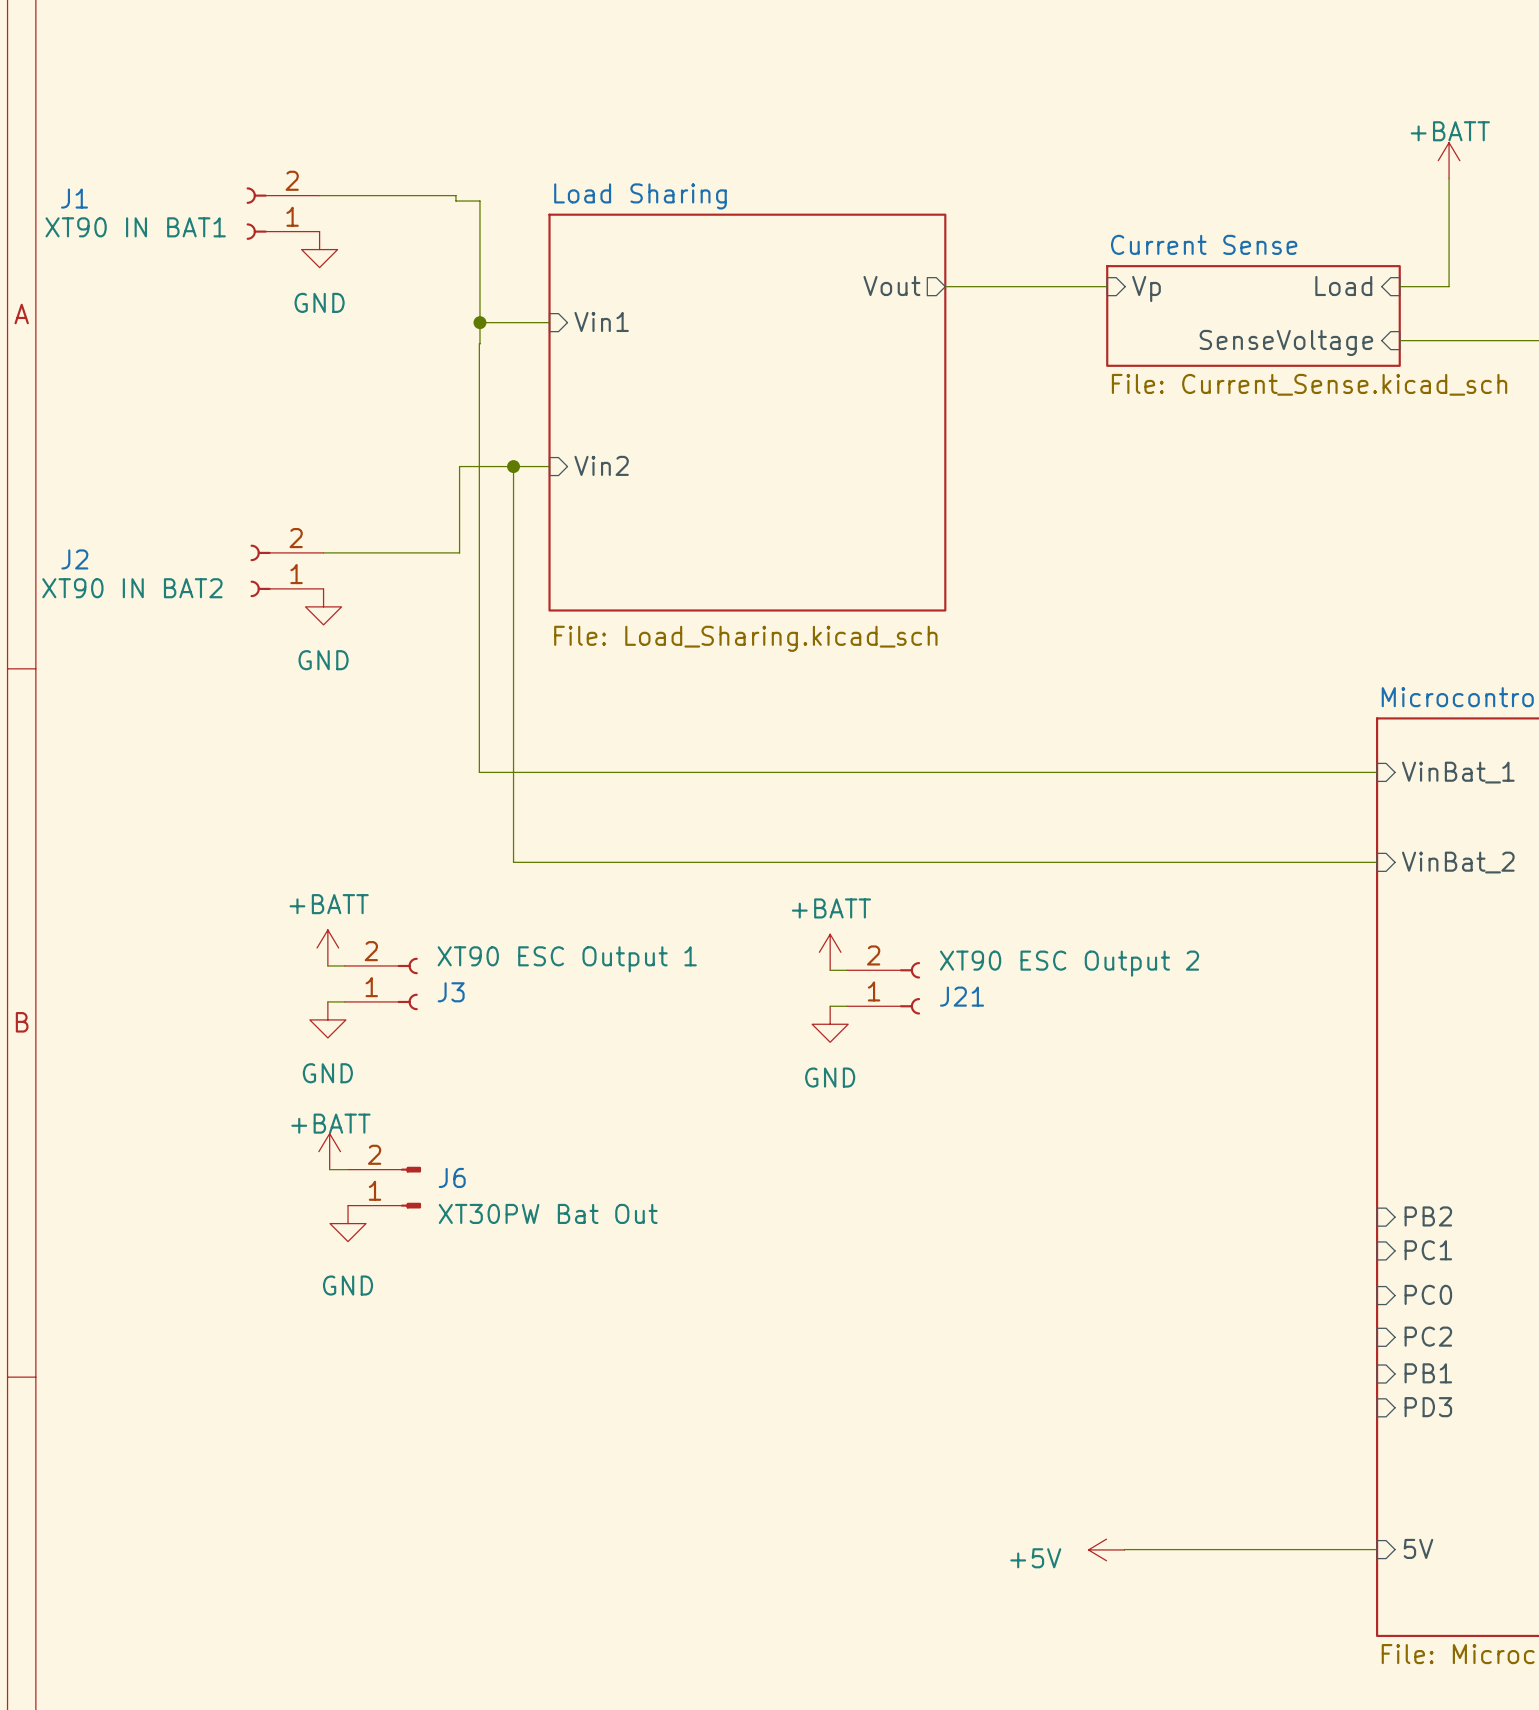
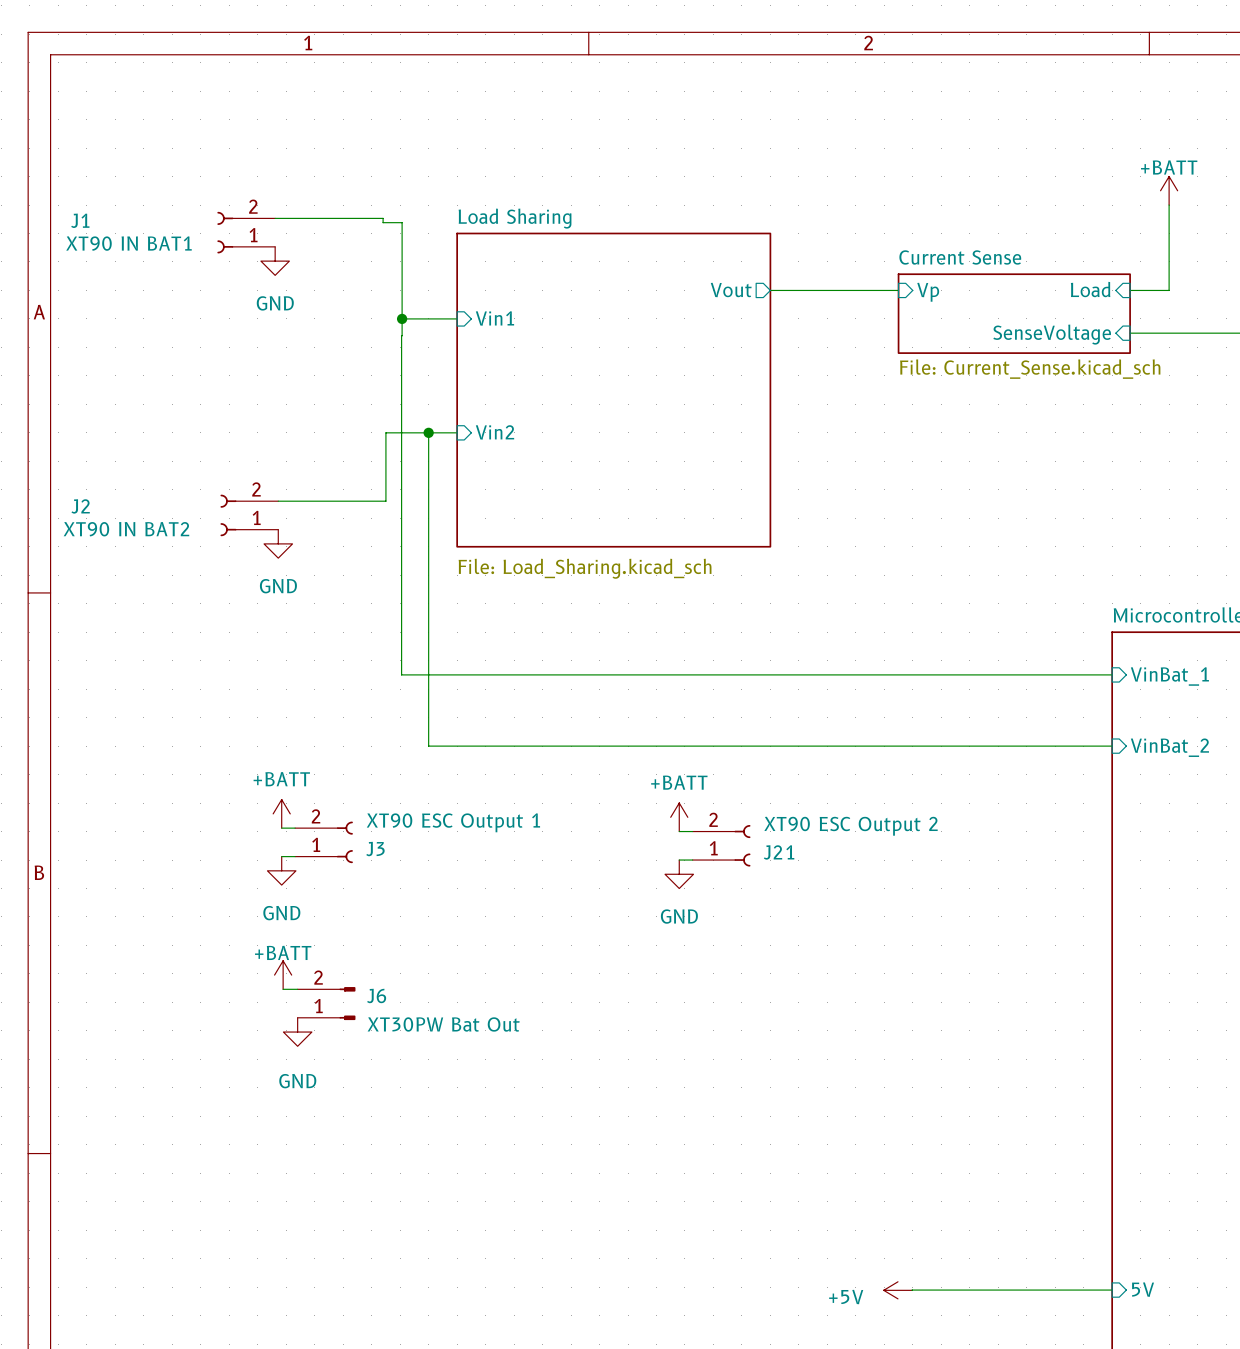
sheet pin: PB2 (1428, 1216) -> none
sheet pin: PC1 (1428, 1250) -> none
sheet pin: PC0 (1428, 1294) -> none
sheet pin: PC2 (1428, 1336) -> none
sheet pin: PB1 (1428, 1373) -> none
sheet pin: PD3 (1428, 1407) -> none

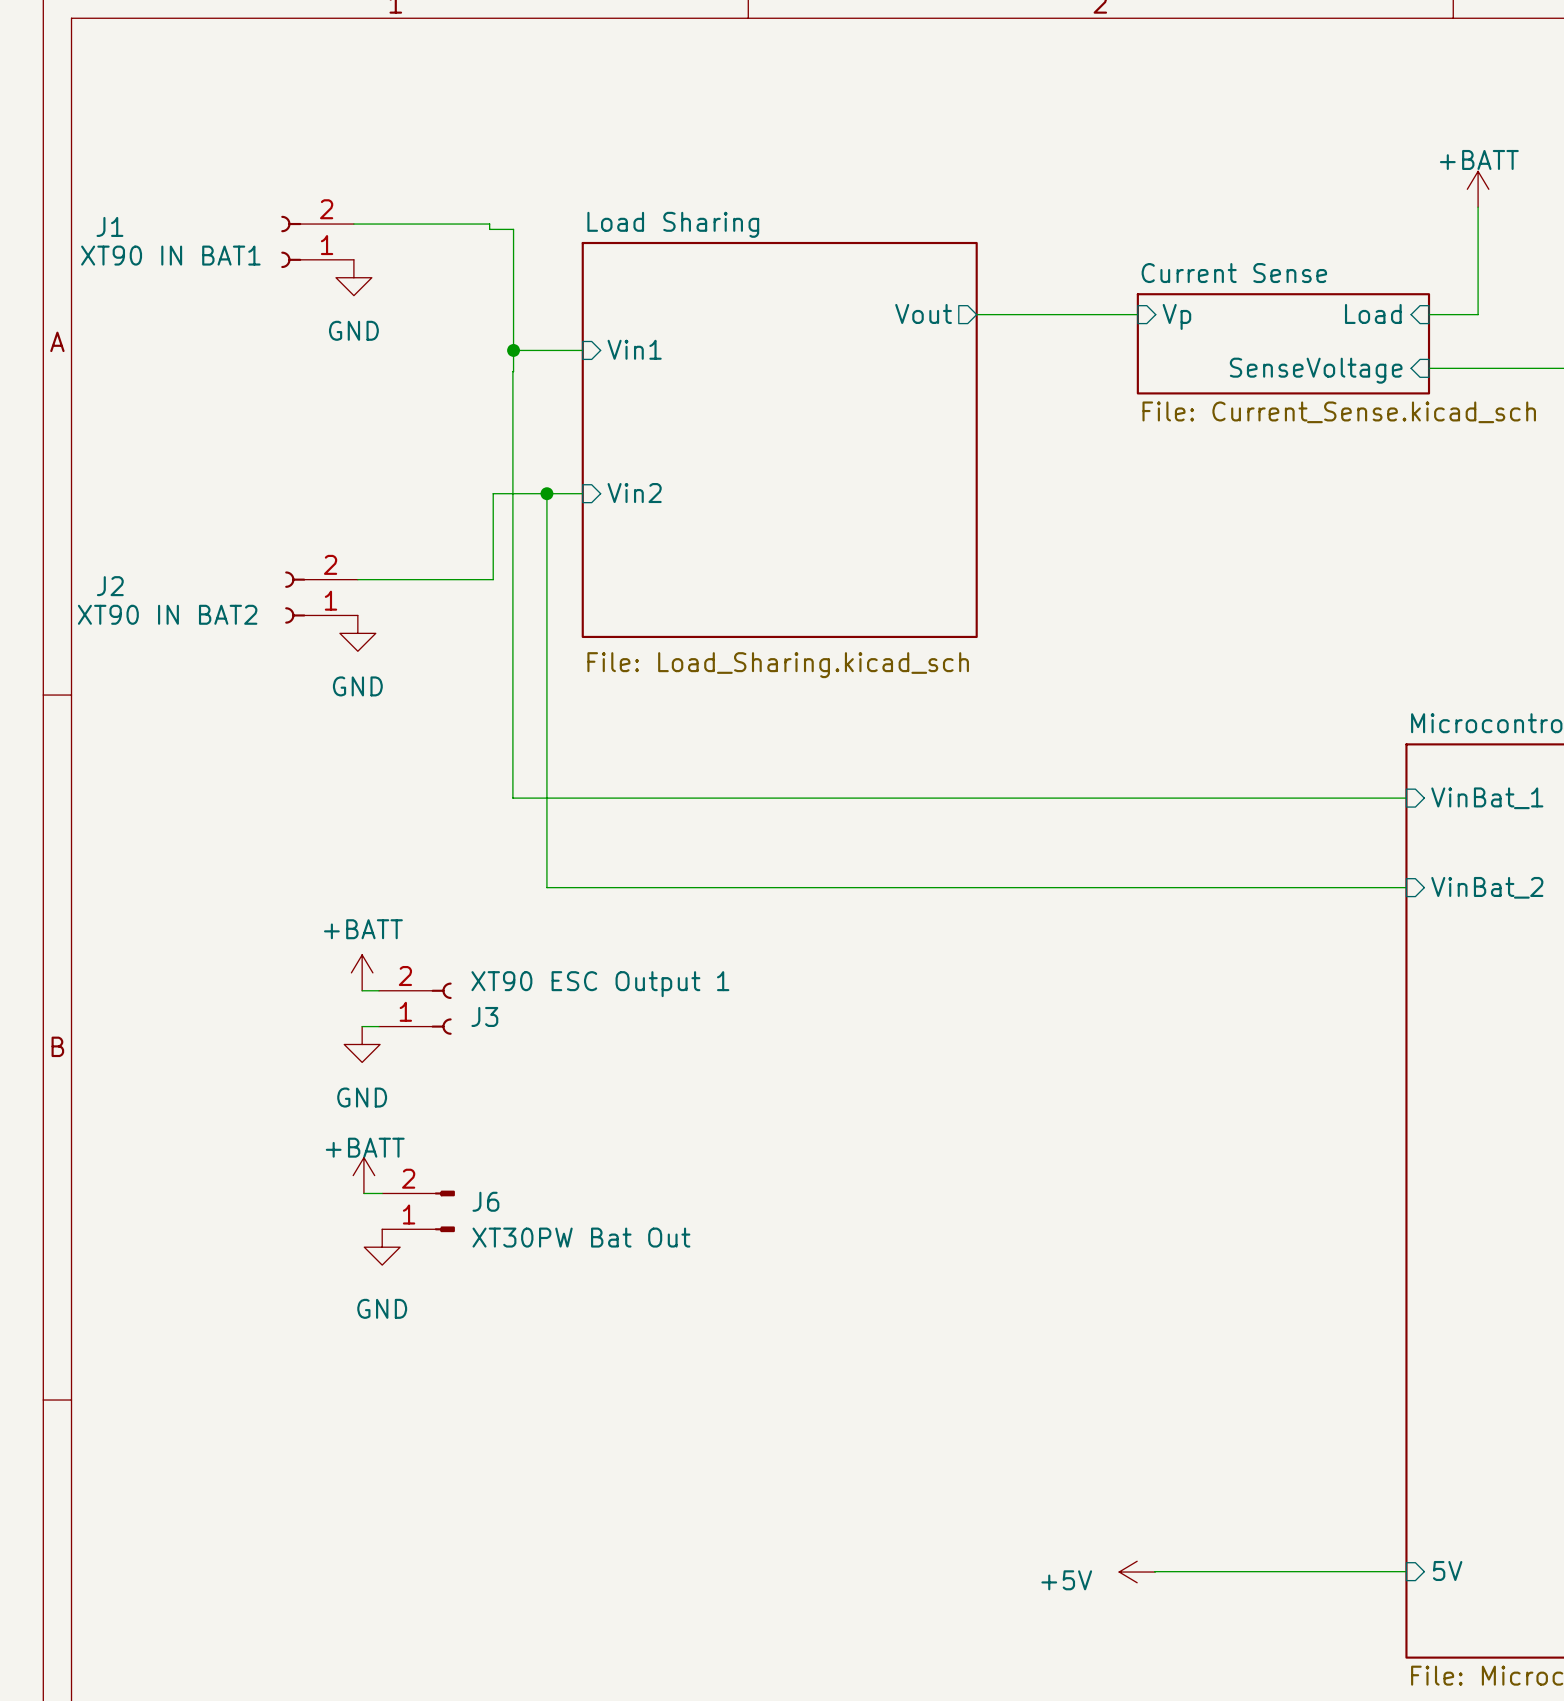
power symbol: +BATT (679, 817) -> none
wire: (679, 831) (692, 831) -> none
J21: XT90 ESC Output 2 (721, 845) -> none
wire: (679, 860) (692, 860) -> none
power symbol: GND (679, 874) -> none

